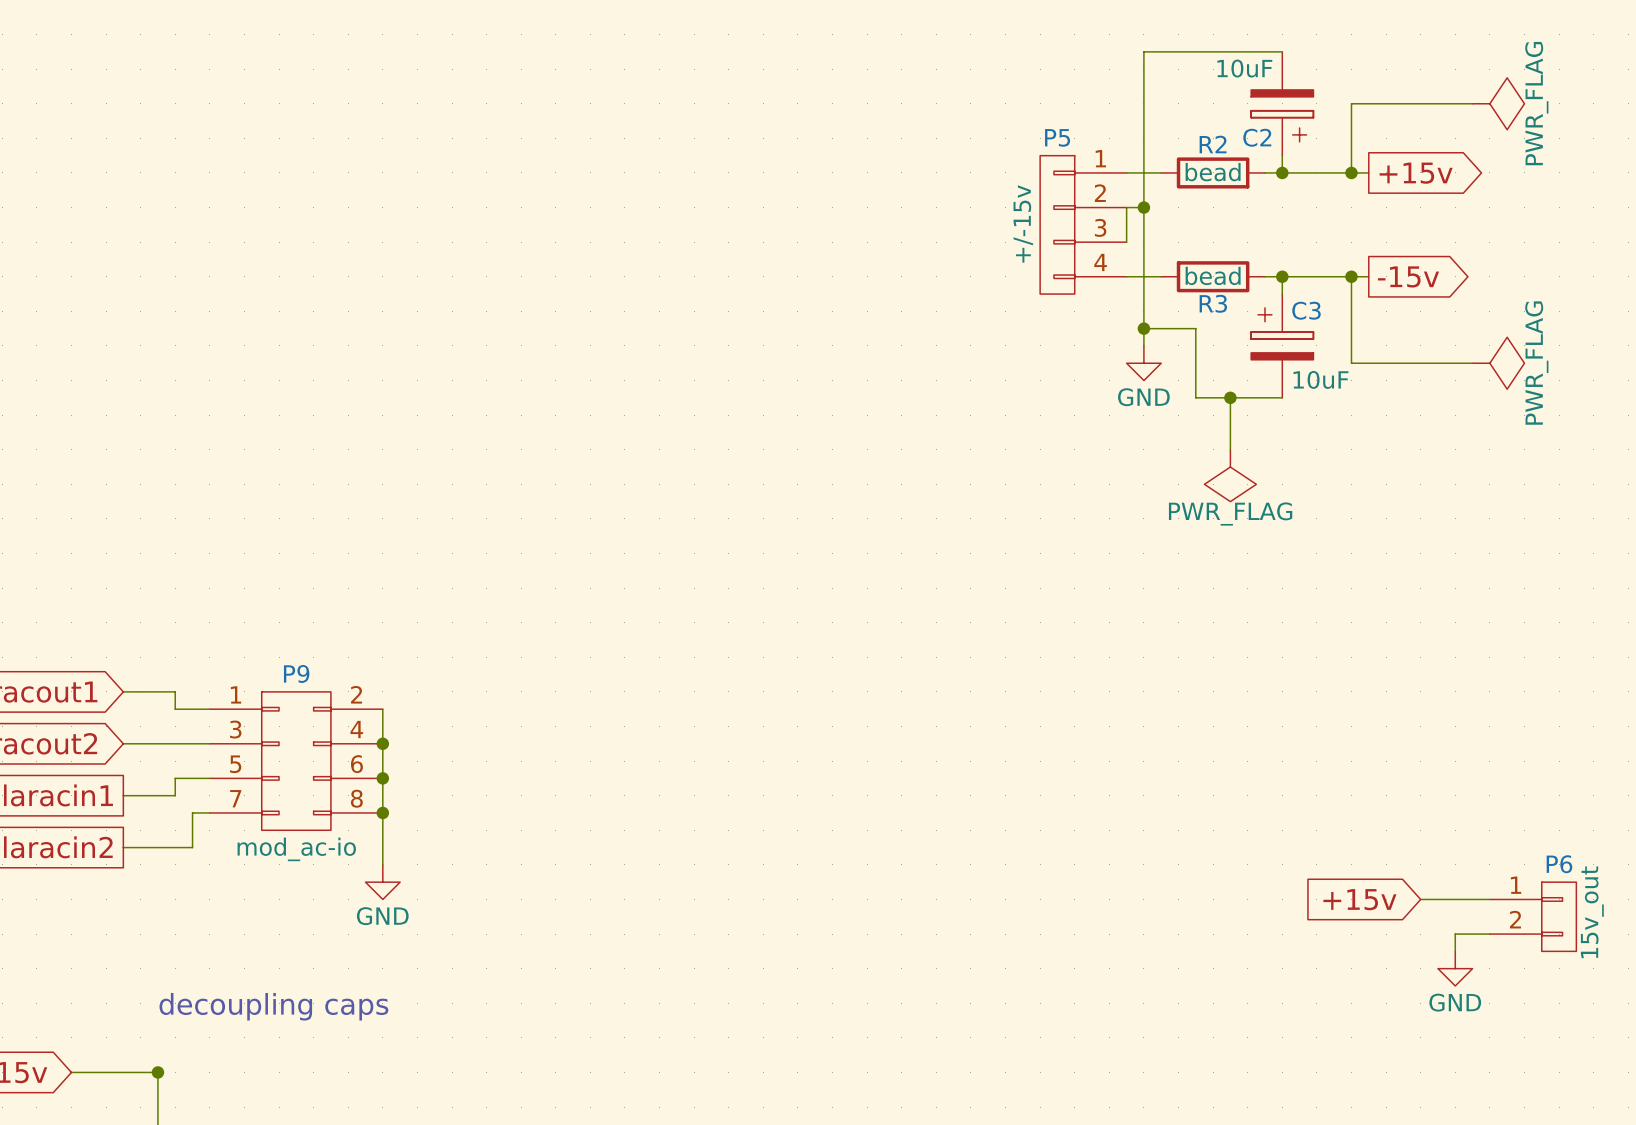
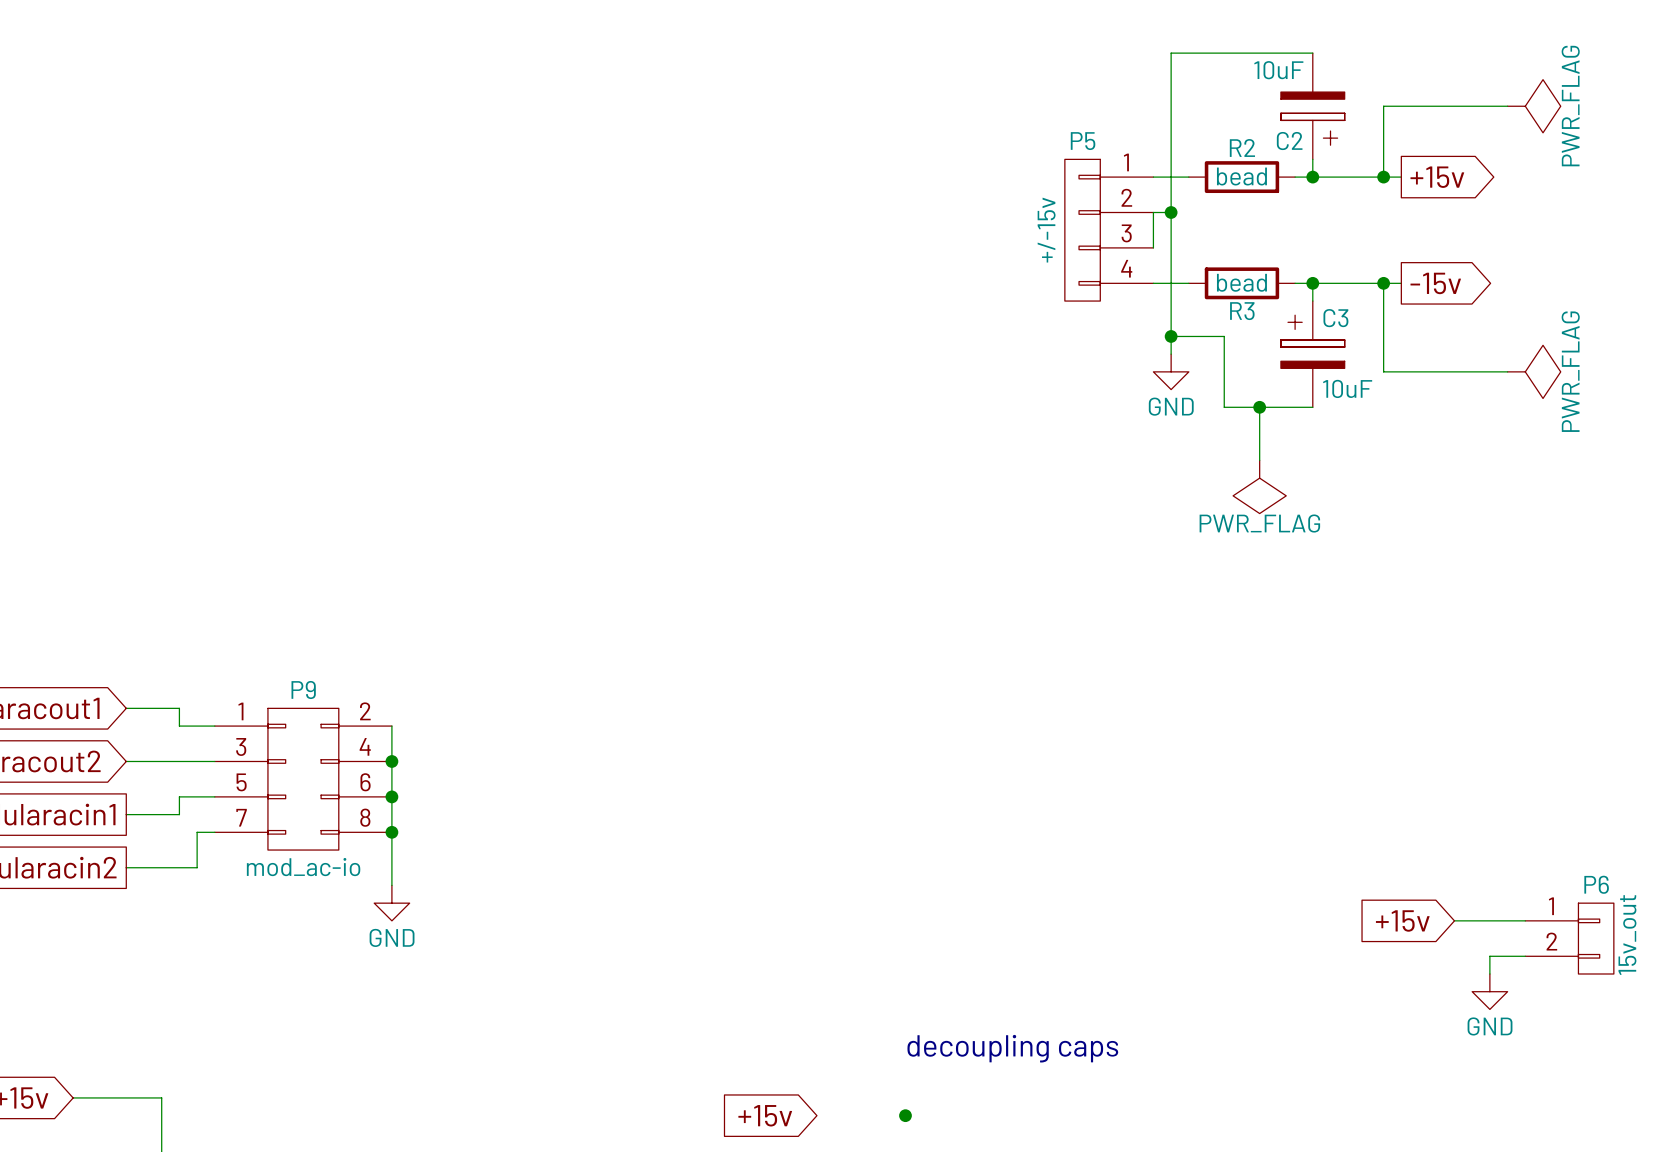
text: decoupling caps (273, 1006) -> none
text: none -> decoupling caps (1012, 1048)
junction: (157, 1072) -> none
global label: none -> +15v (765, 1115)
junction: none -> (905, 1115)

